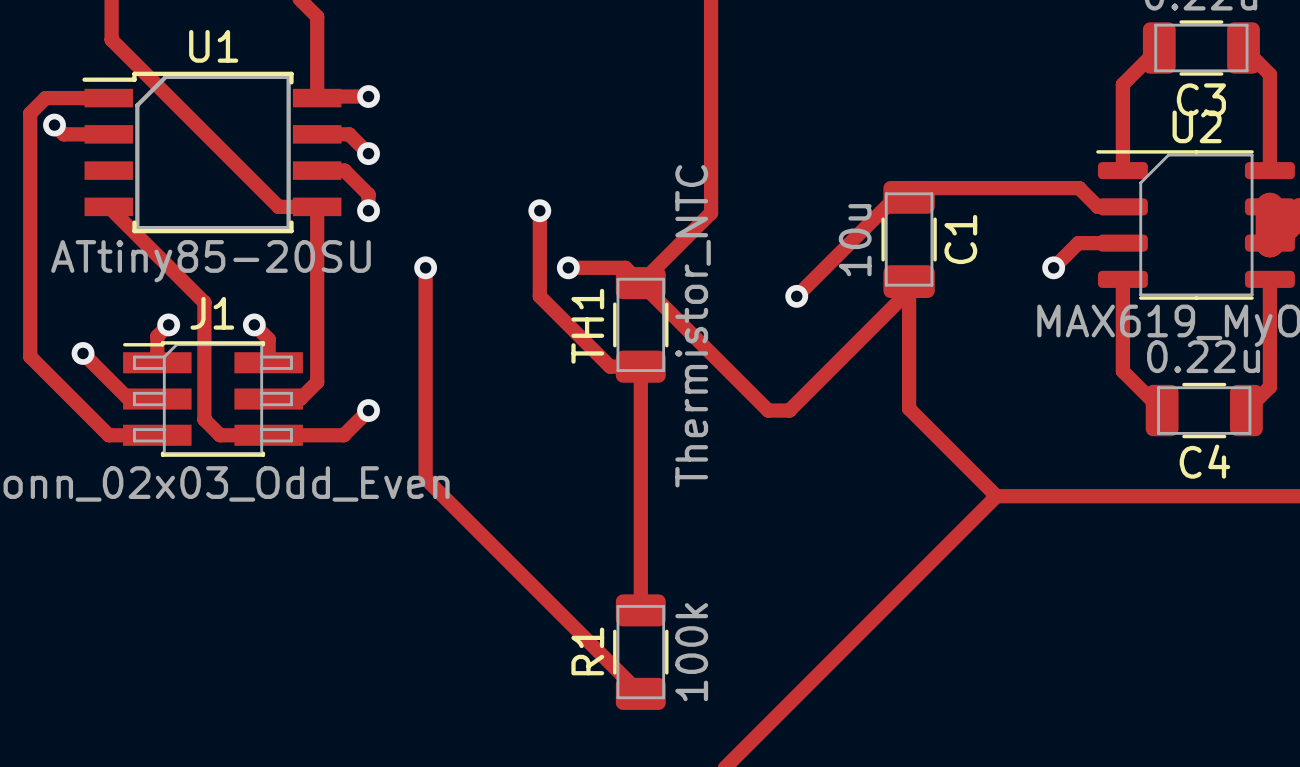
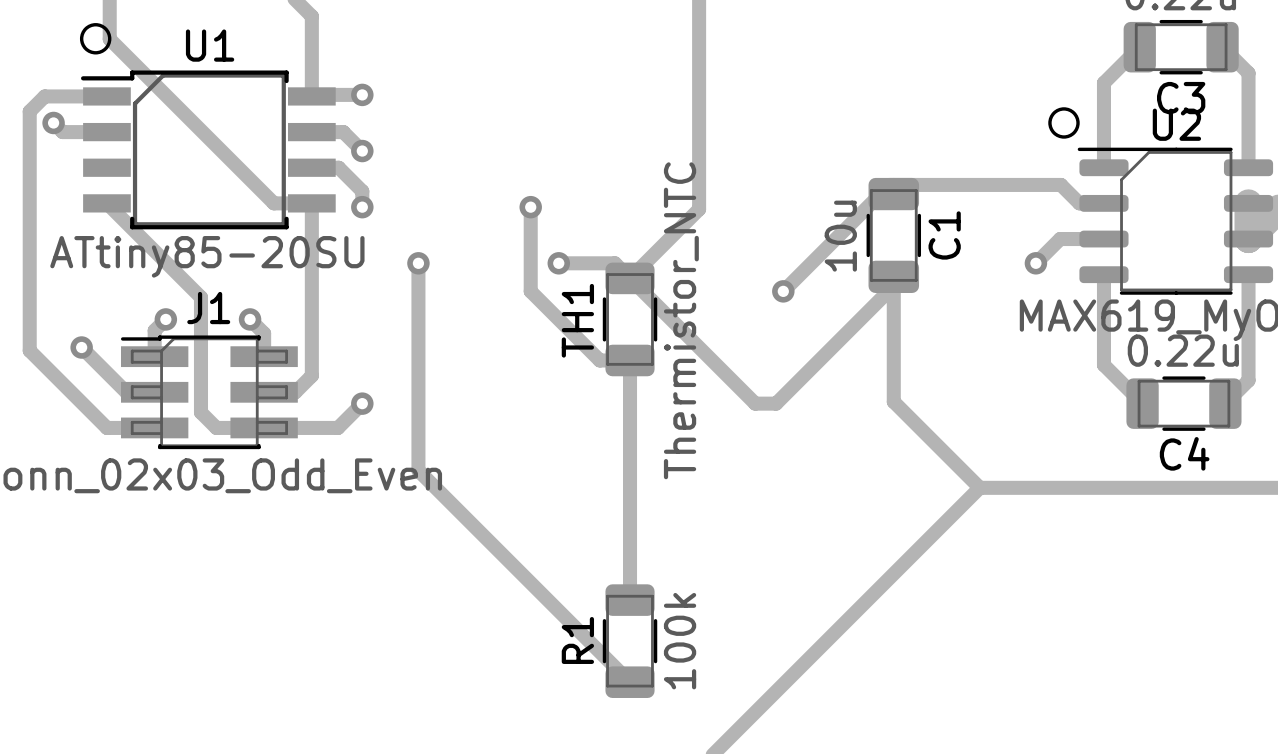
drawing: none -> [79, 23, 112, 55]
drawing: none -> [1048, 107, 1080, 139]

